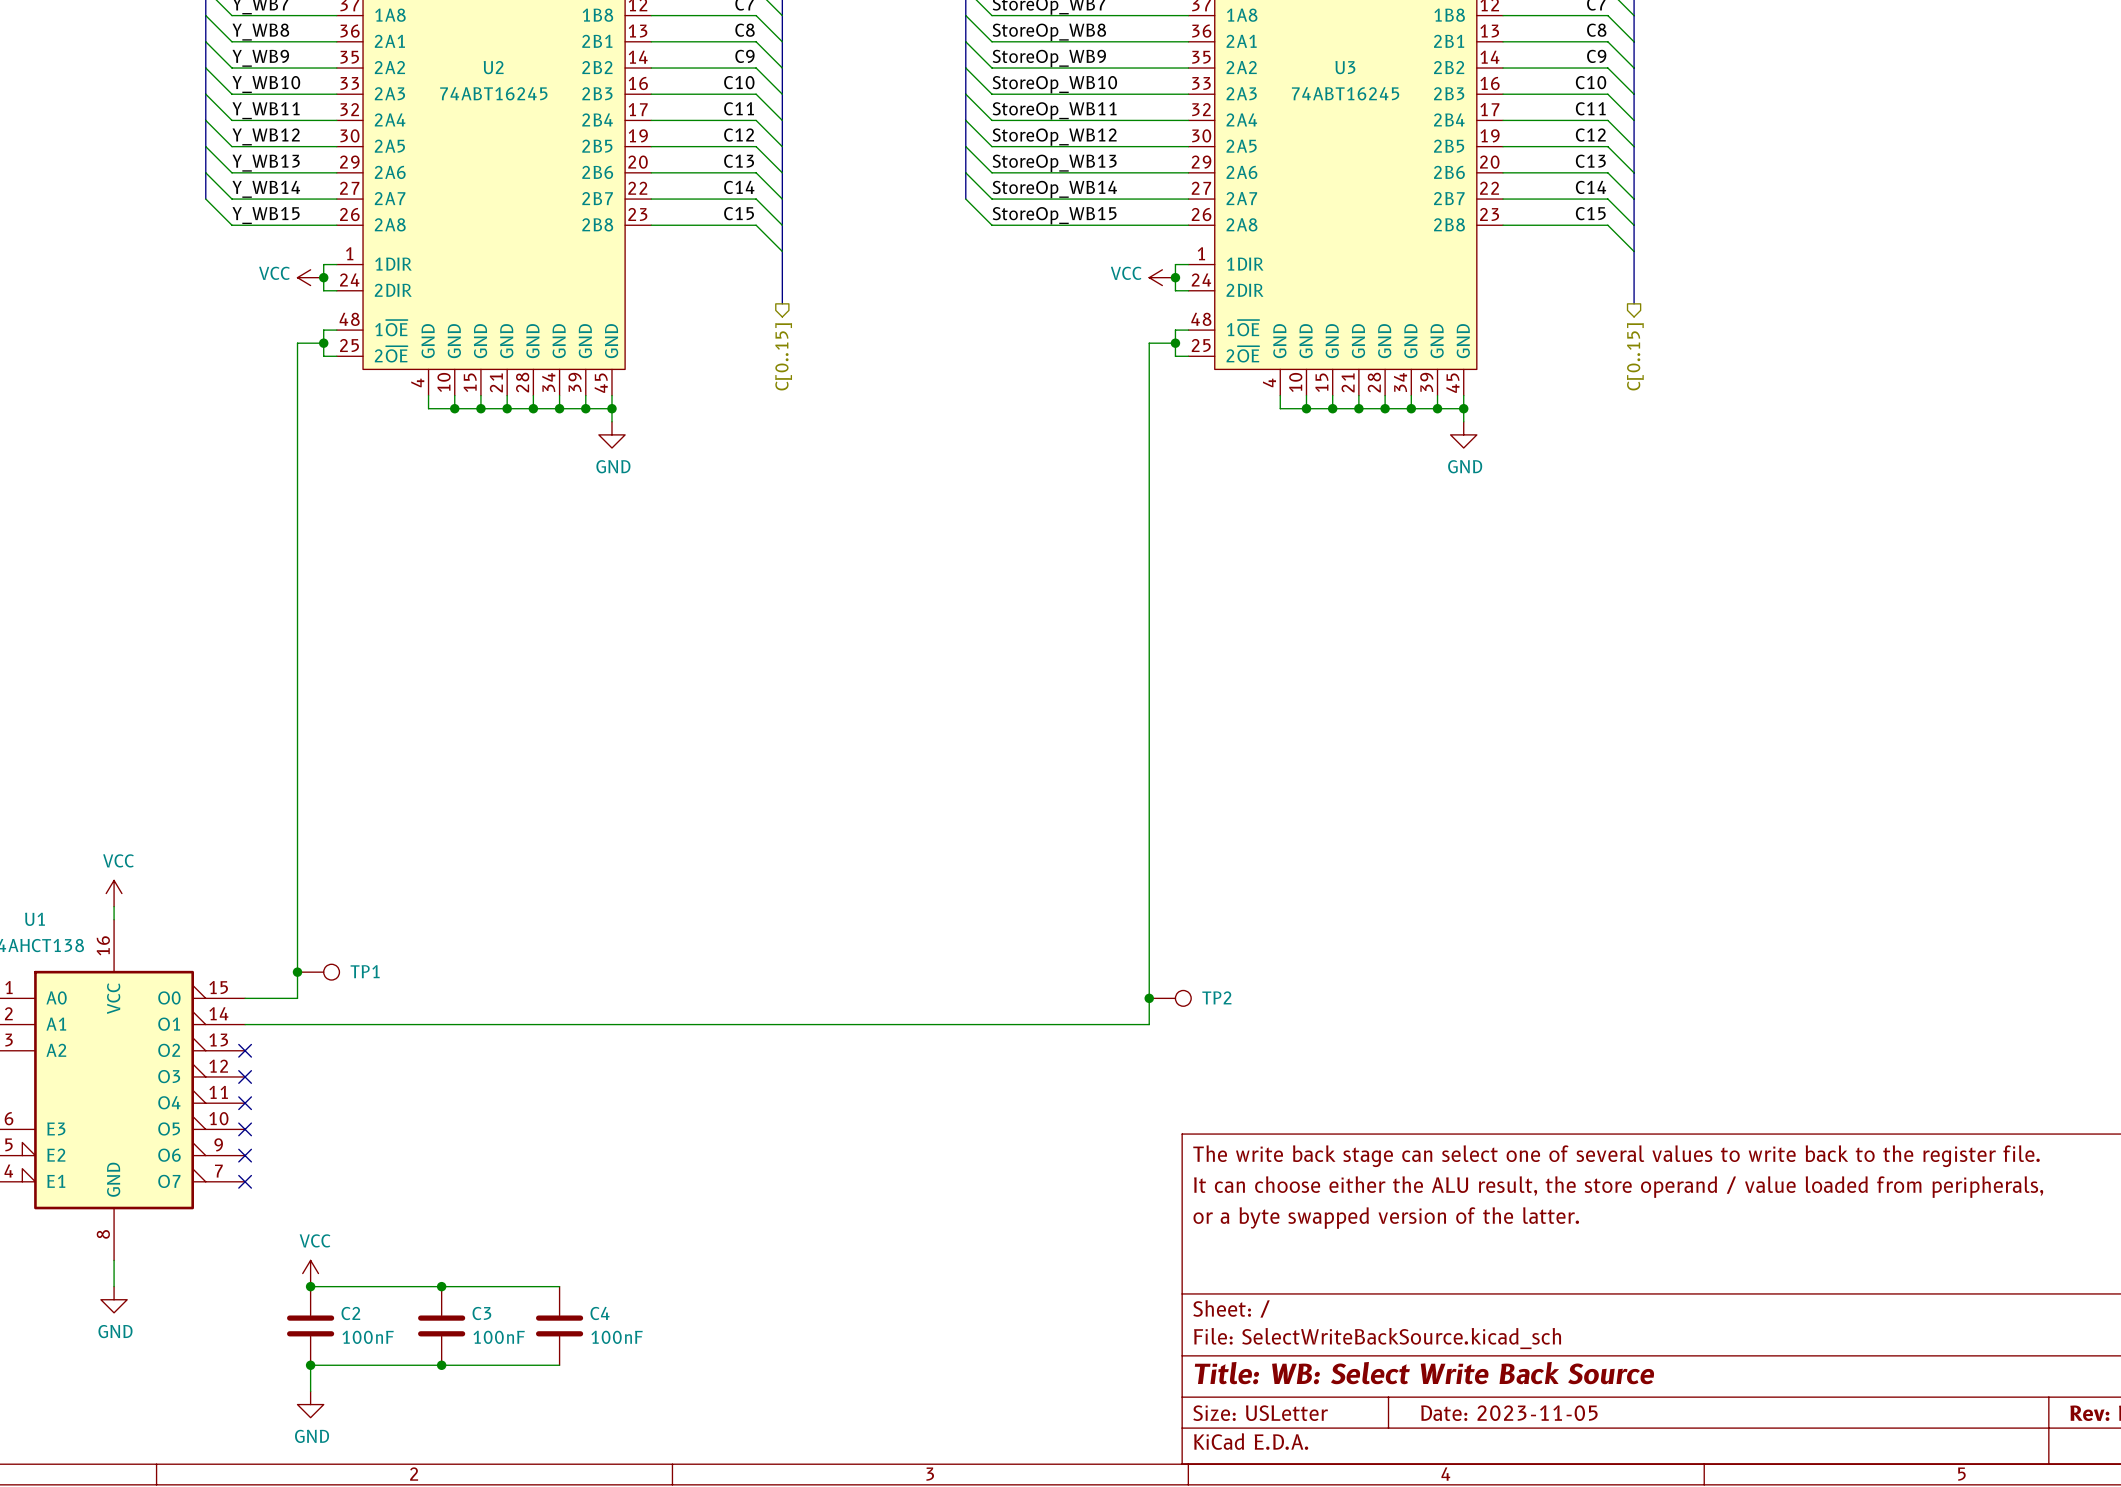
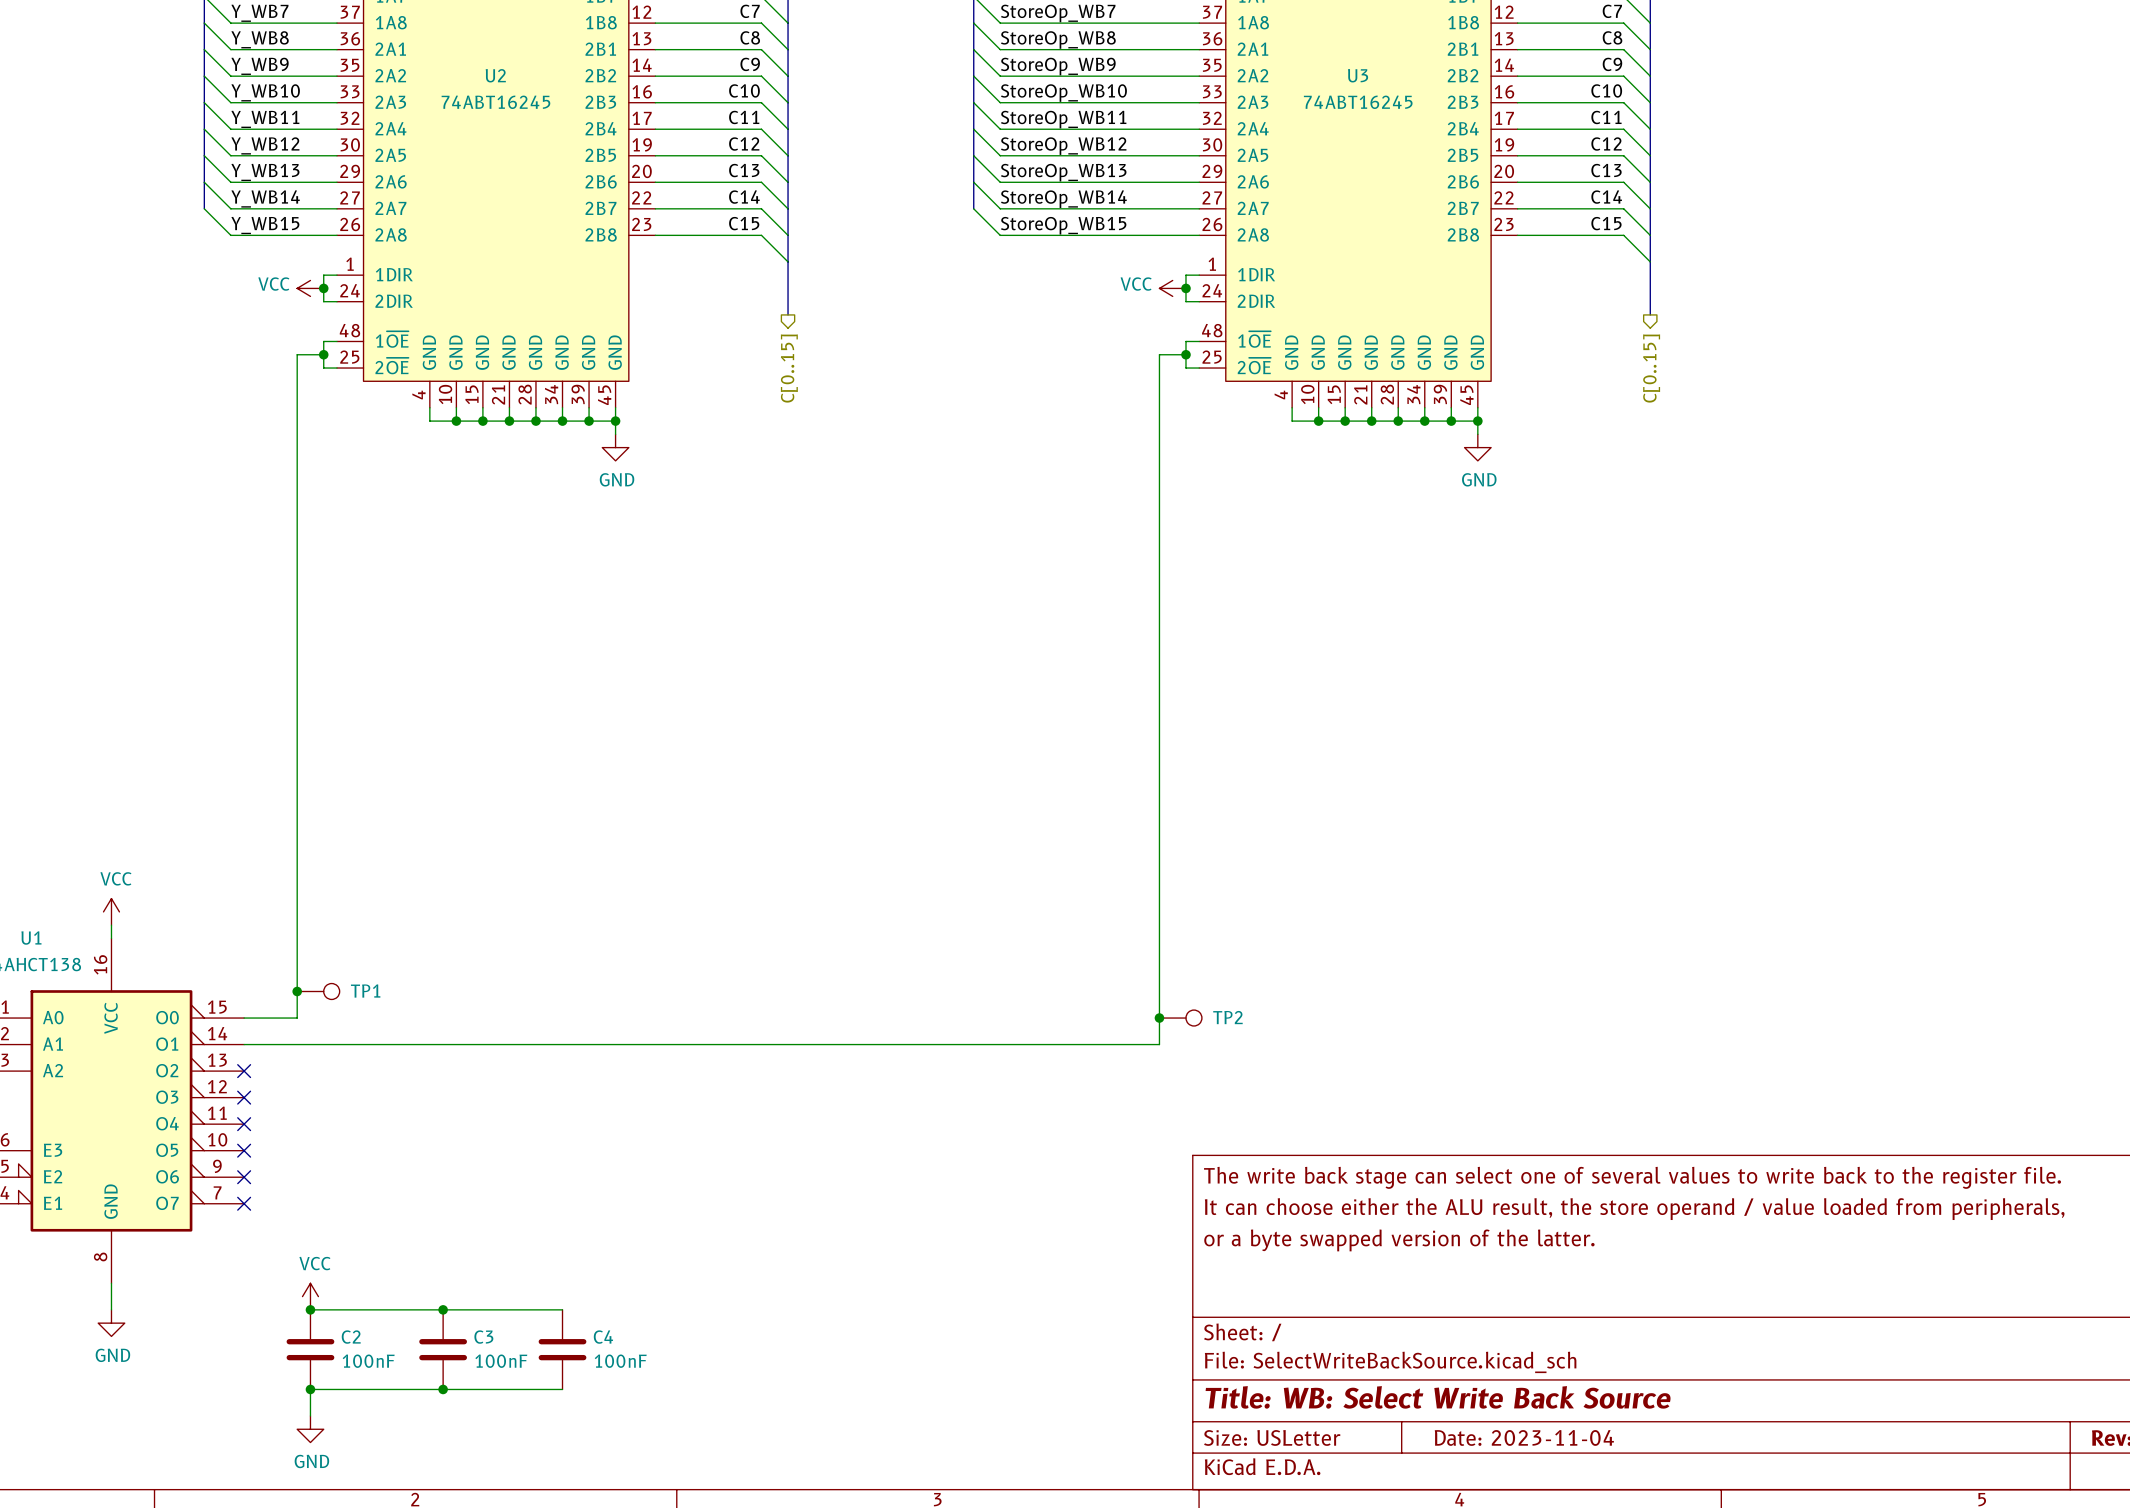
title block: Date: 2023-11-05 (1509, 1413) -> Date: 2023-11-04 (1524, 1437)

